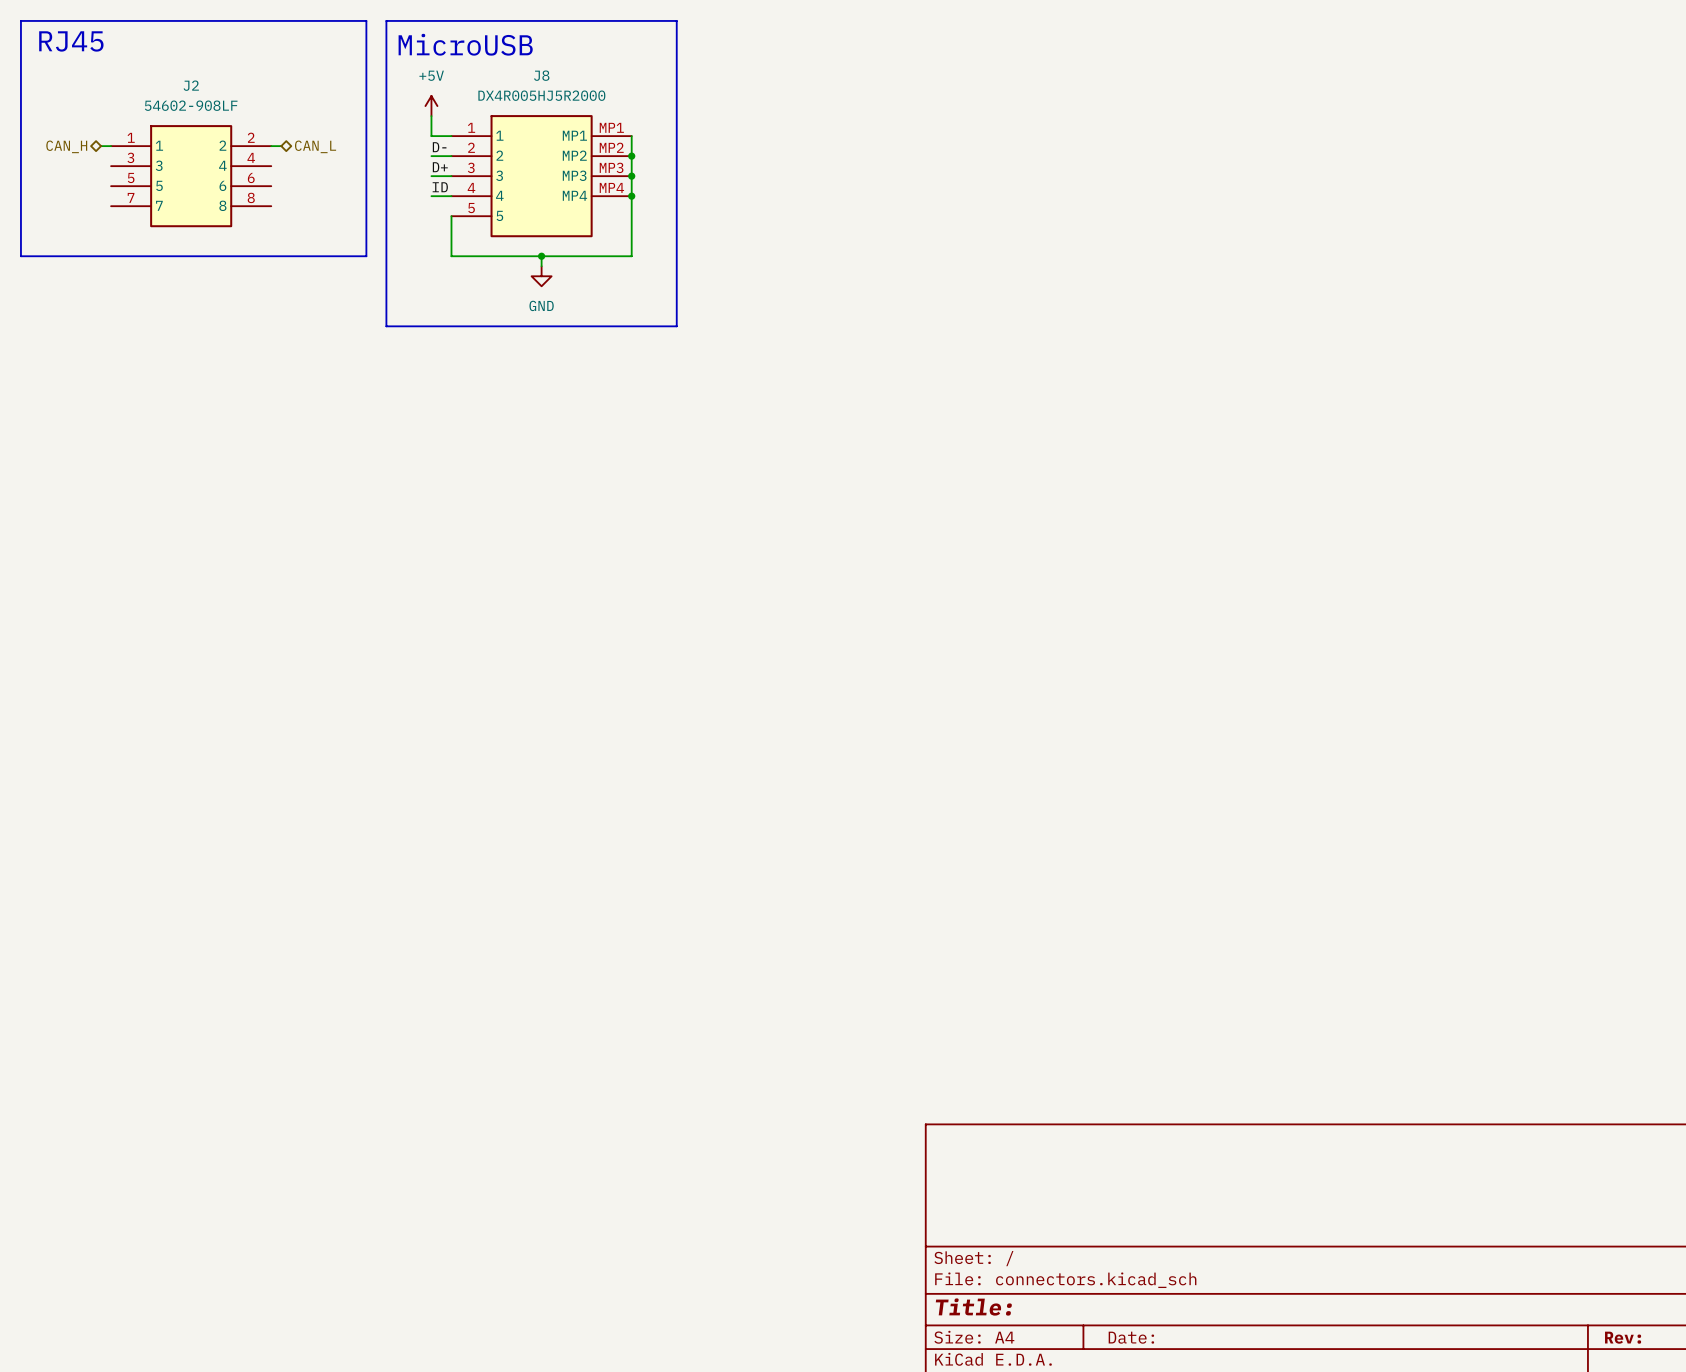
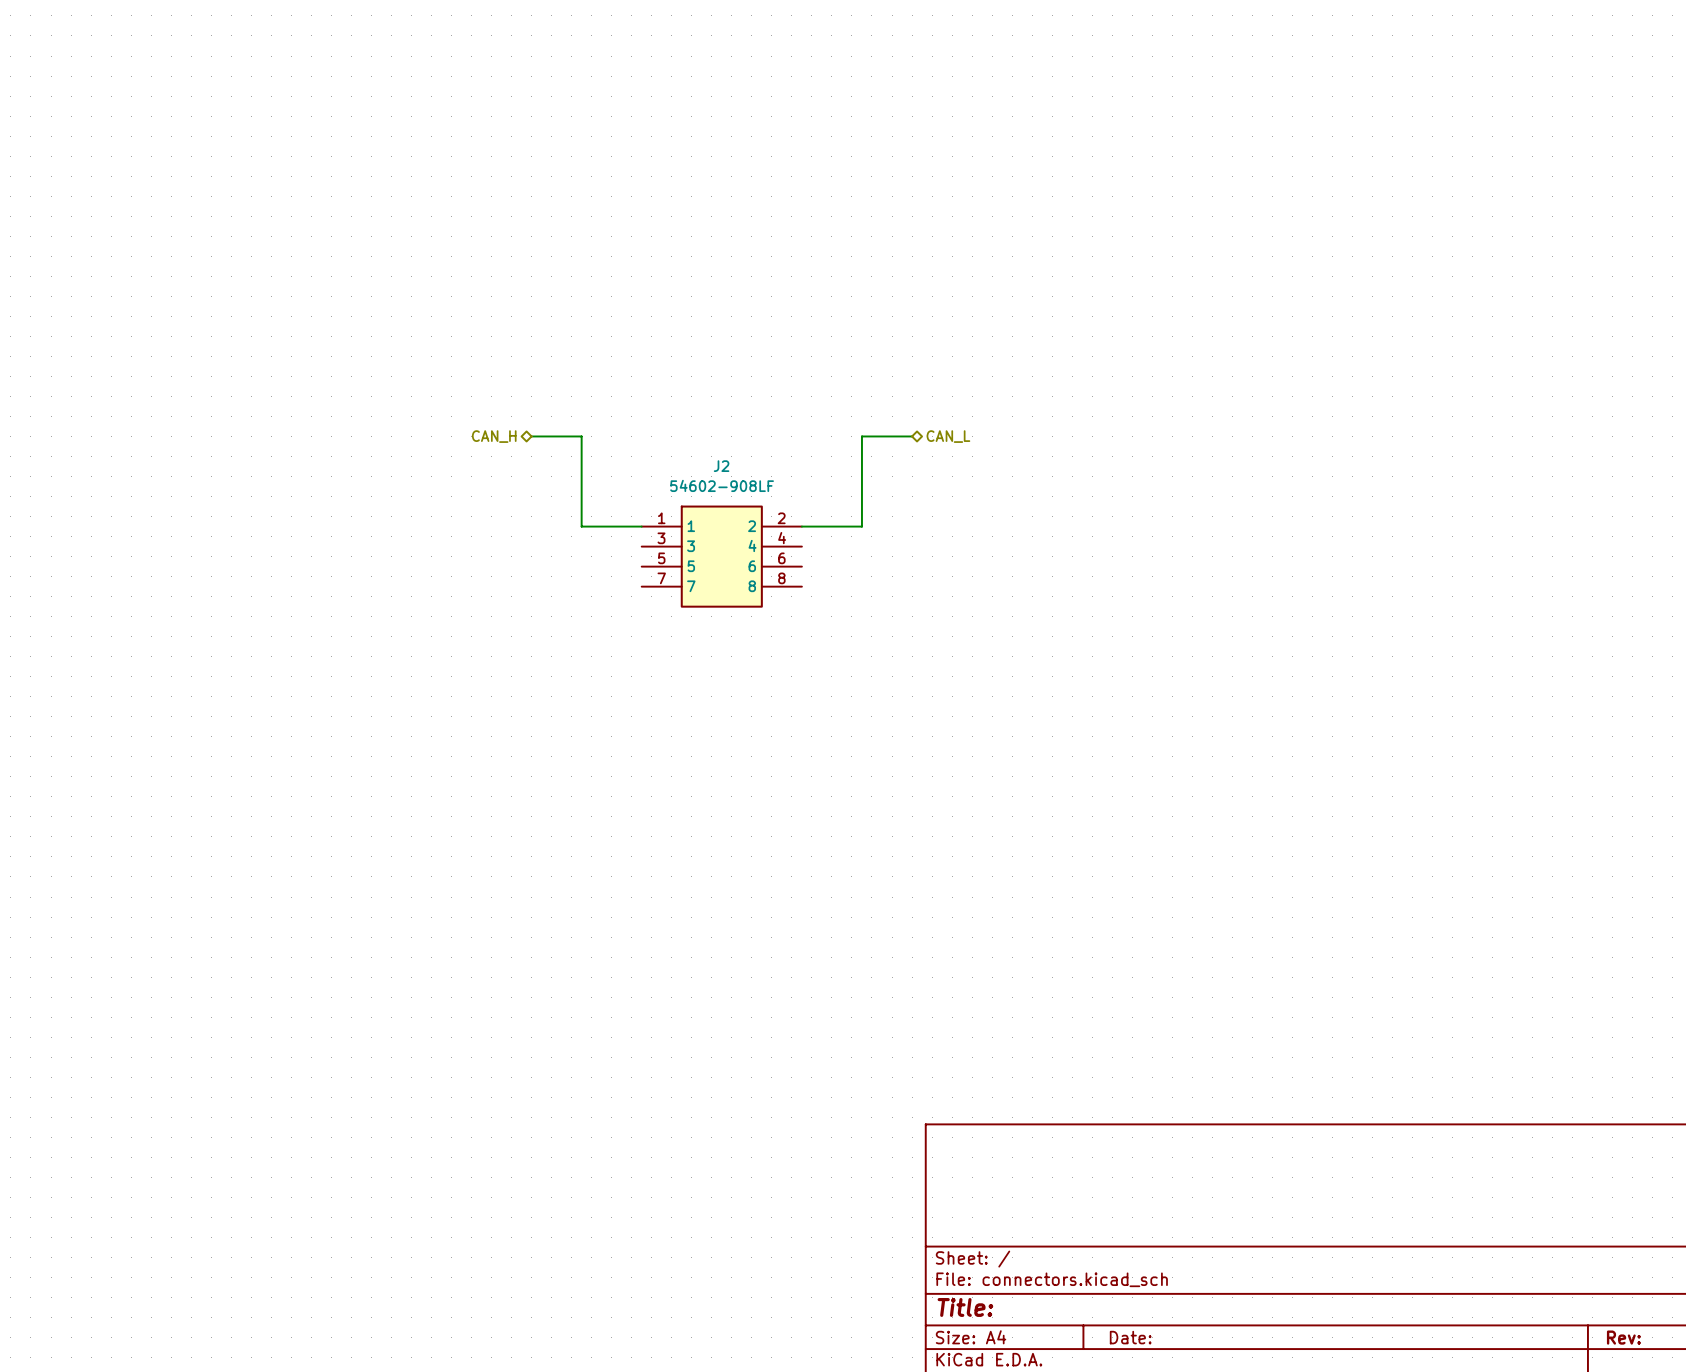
line: (20, 20) (366, 20) (366, 256) (20, 256) (20, 20) -> none
line: (386, 20) (676, 20) (676, 326) (386, 326) (386, 20) -> none
text: RJ45 (71, 41) -> none
text: MicroUSB (465, 44) -> none
power symbol: +5V (431, 106) -> none
wire: (431, 116) (431, 136) (451, 136) -> none
wire: (631, 136) (631, 256) (451, 256) (451, 216) -> none
hierarchical label: CAN_H (66, 146) -> none
wire: (101, 146) (111, 146) -> none
wire: (271, 146) (281, 146) -> none
hierarchical label: CAN_L (315, 146) -> none
label: D- (439, 147) -> none
wire: (431, 156) (451, 156) -> none
junction: (631, 156) -> none
label: D+ (440, 167) -> none
J2 position: (191, 176) -> (721, 556)
wire: (431, 176) (451, 176) -> none
J8: DX4R005HJ5R2000 (541, 176) -> none
junction: (631, 176) -> none
label: ID (440, 187) -> none
wire: (431, 196) (451, 196) -> none
junction: (631, 196) -> none
wire: (541, 256) (541, 266) -> none
junction: (541, 256) -> none
power symbol: GND (541, 276) -> none
wire: none -> (531, 436) (581, 436) (581, 526) (641, 526)
wire: none -> (912, 436) (861, 436) (861, 526) (801, 526)
hierarchical label: none -> CAN_H (494, 436)
hierarchical label: none -> CAN_L (948, 436)

